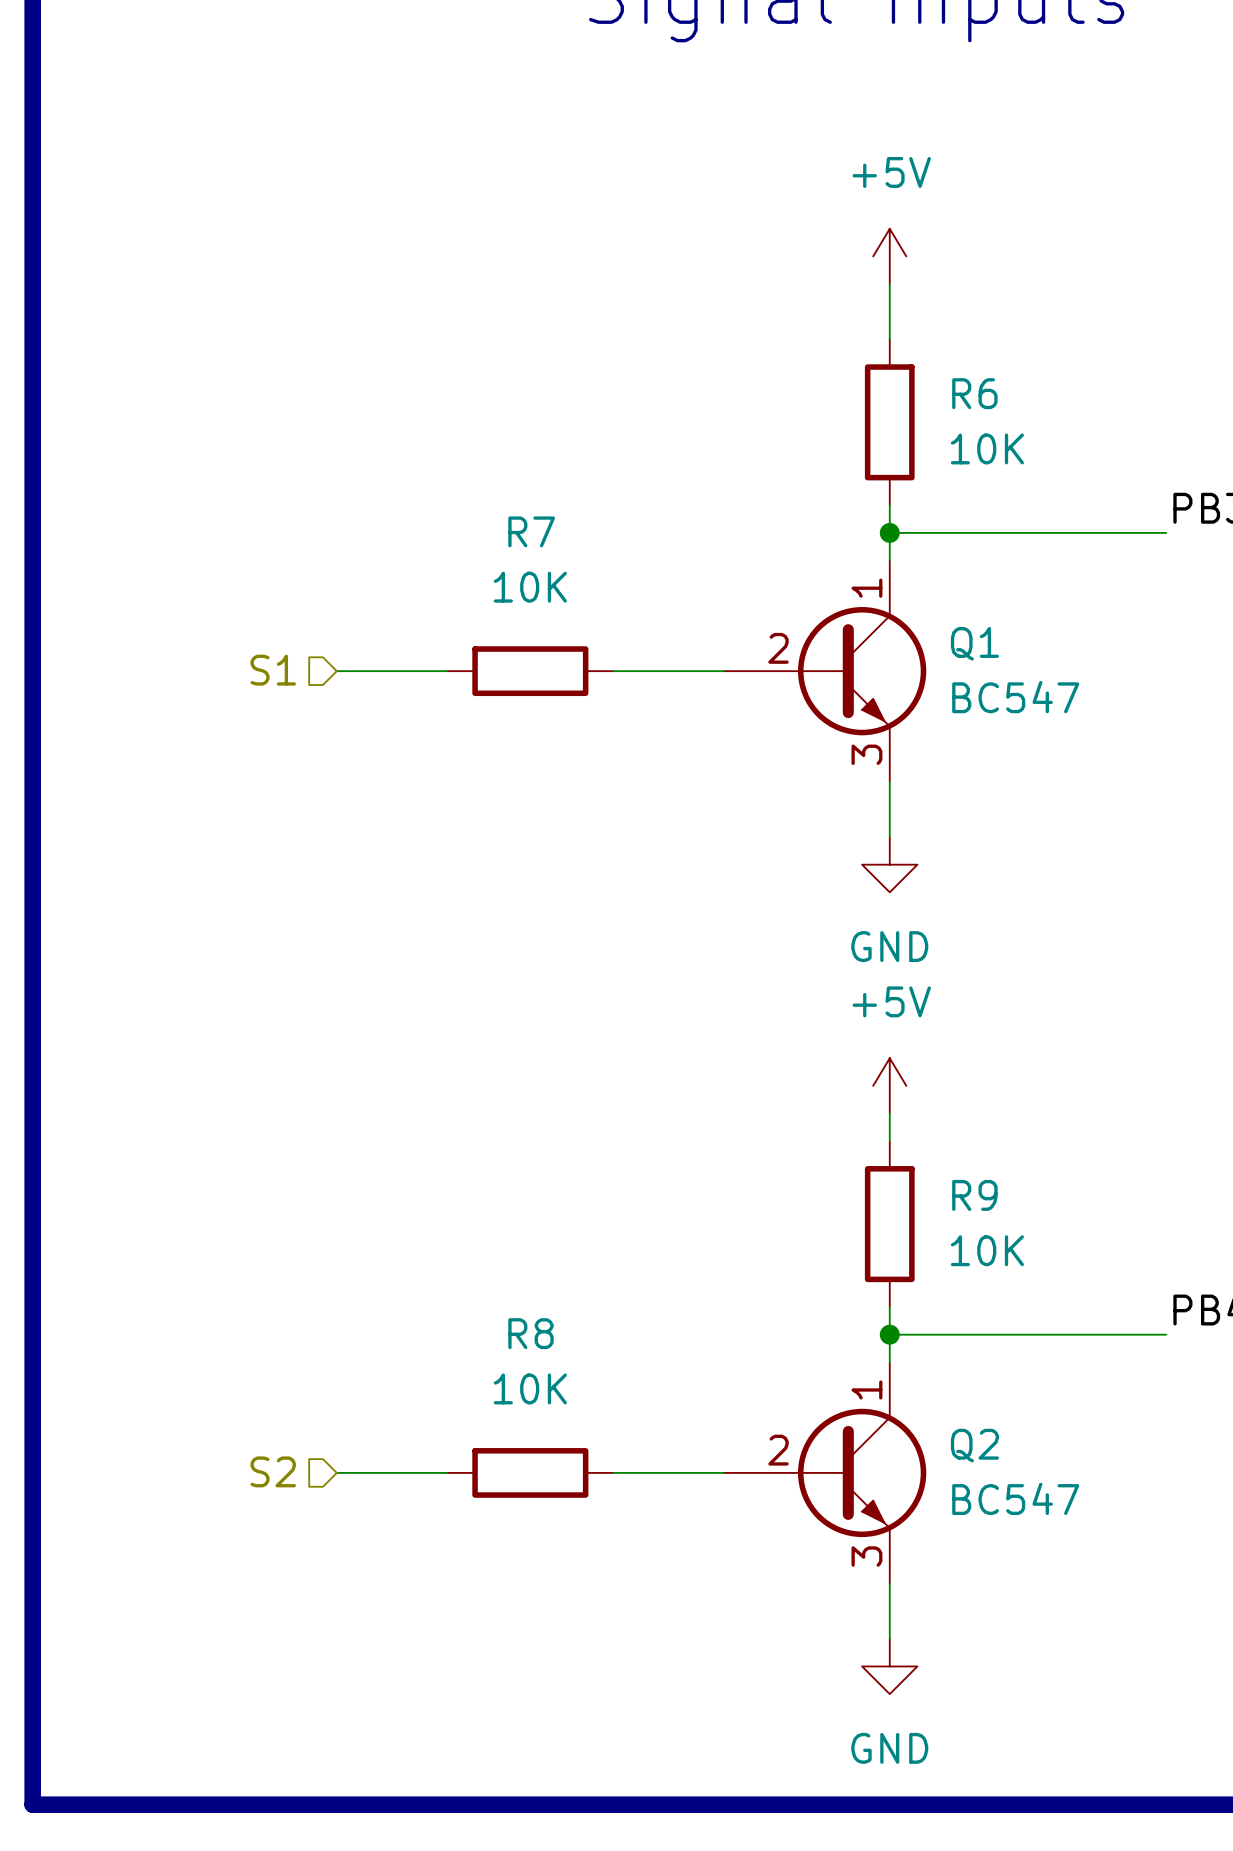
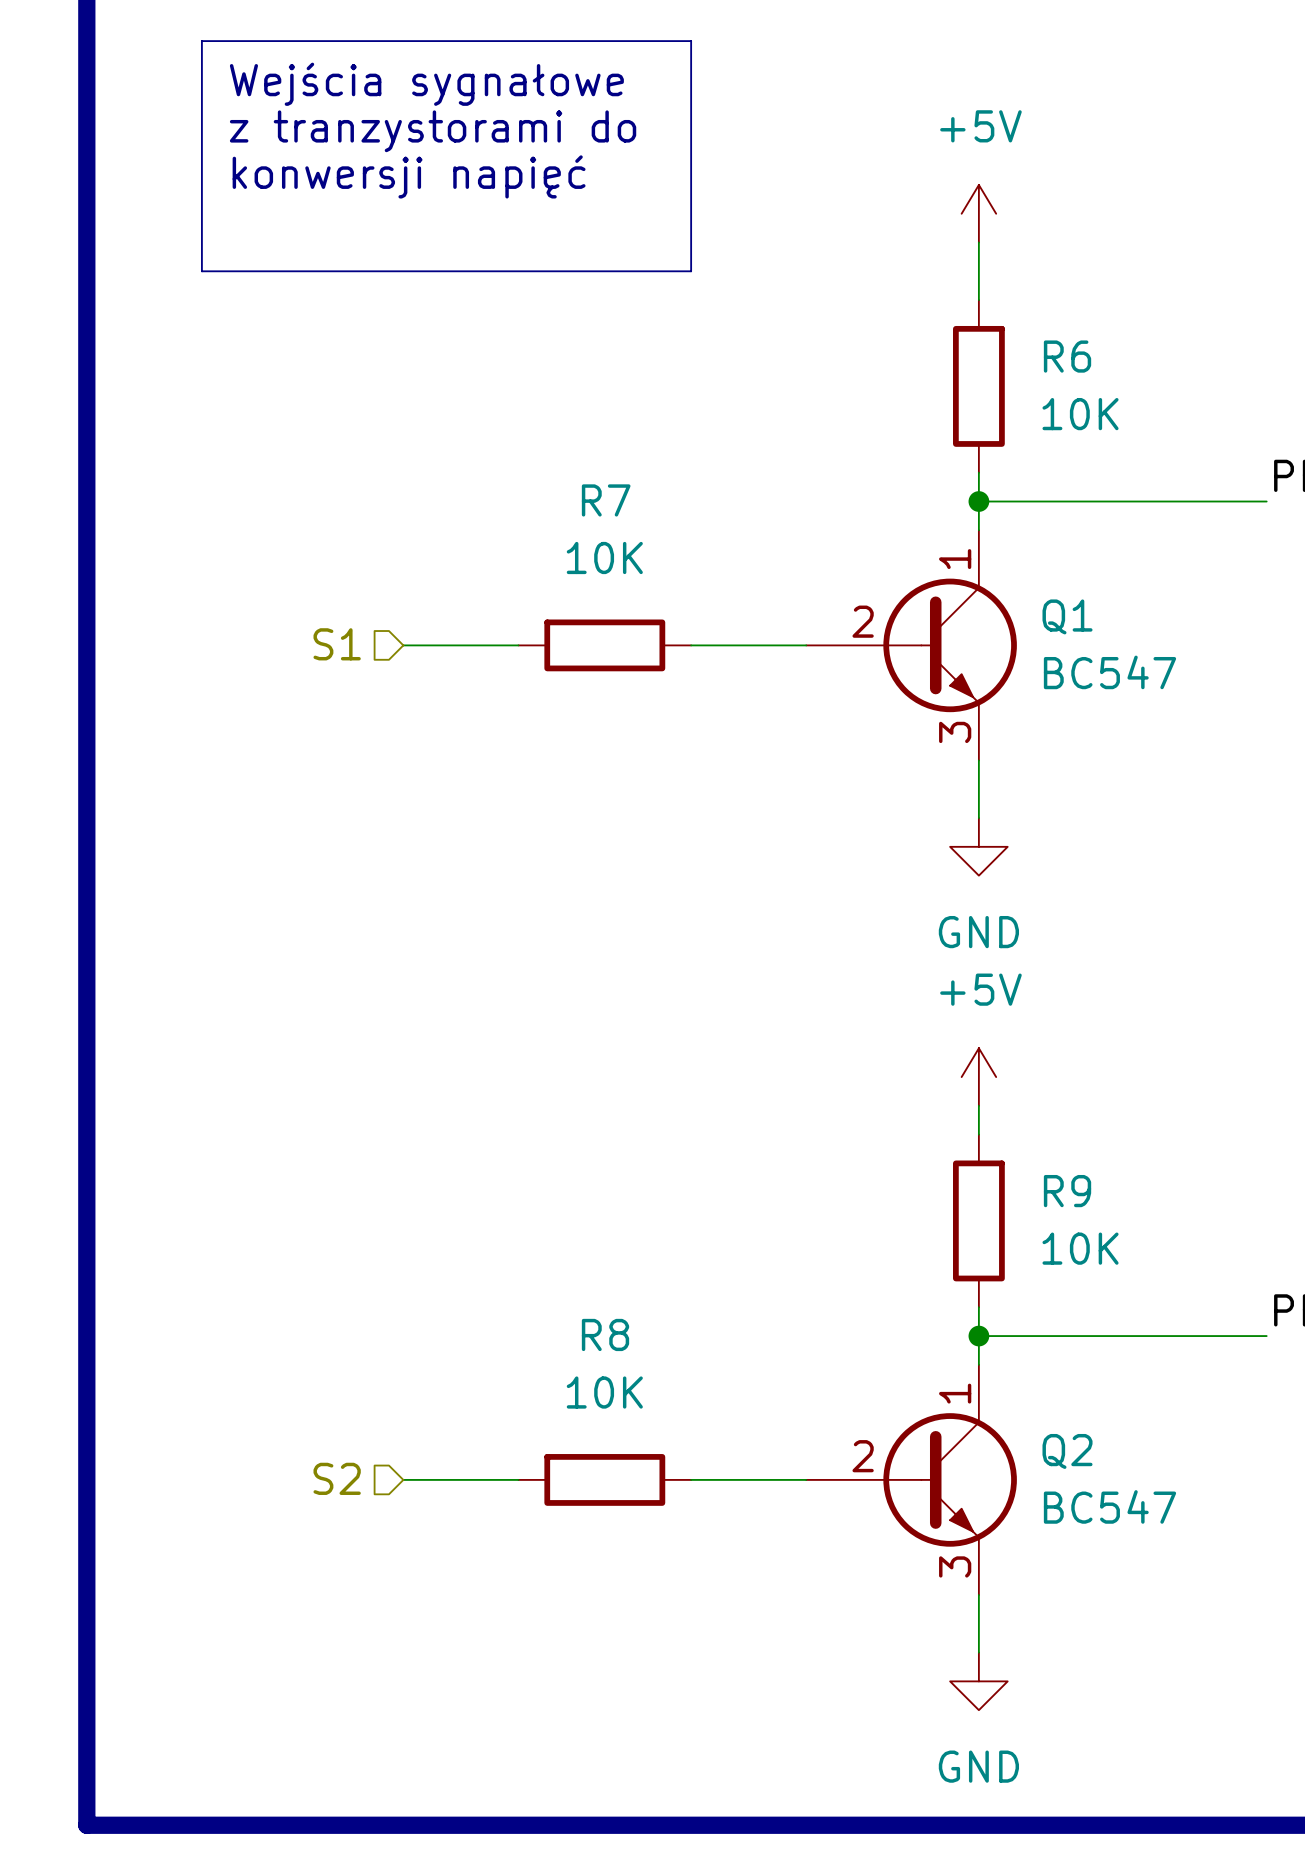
line: none -> (201, 41) (691, 41) (691, 271) (201, 271) (201, 41)
text: none -> Wejścia sygnałowe (426, 84)
text: none -> z tranzystorami do (433, 131)
text: none -> konwersji napięć (409, 176)

